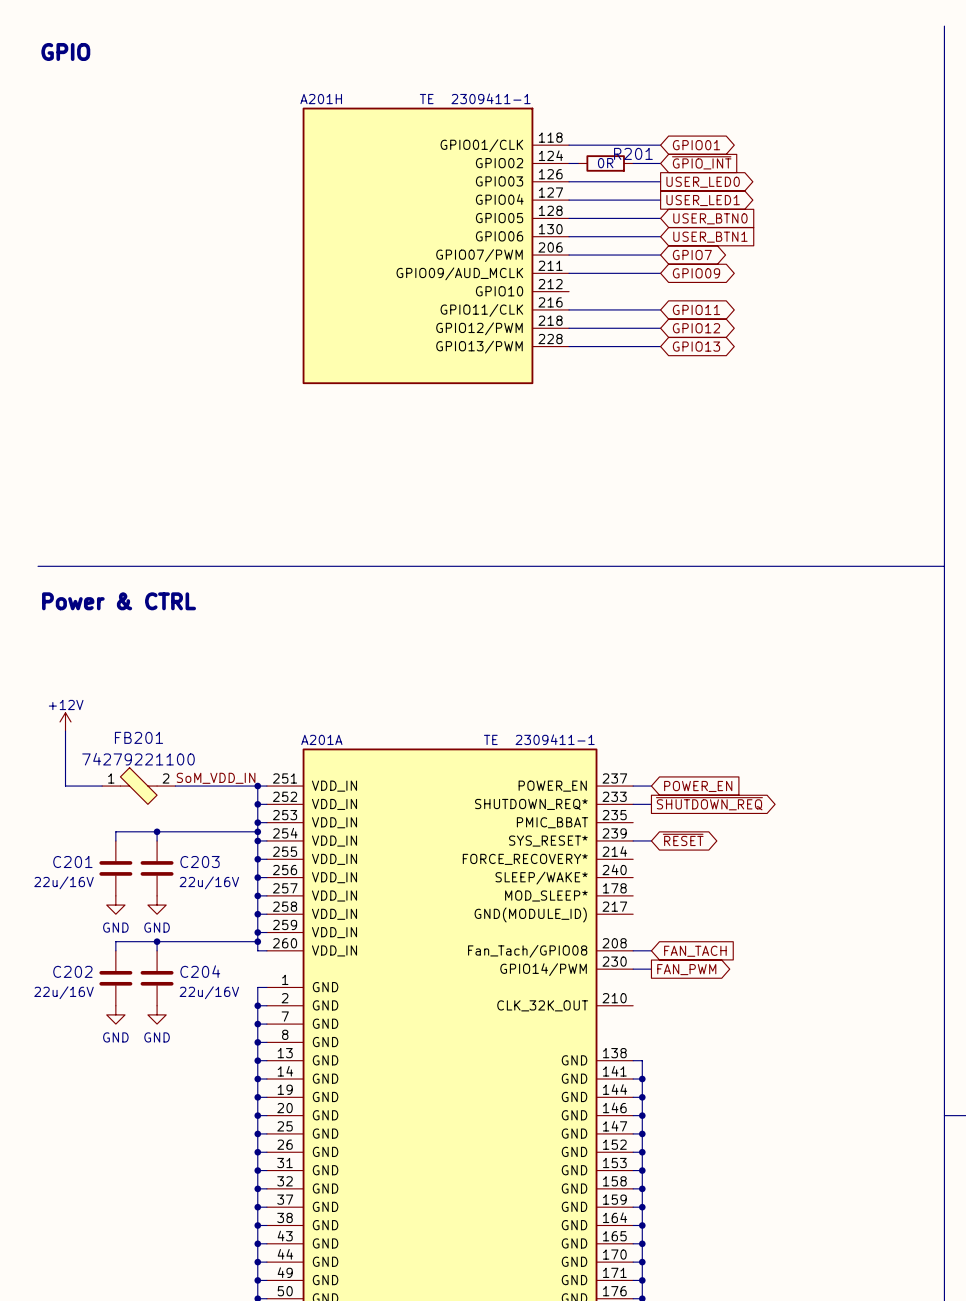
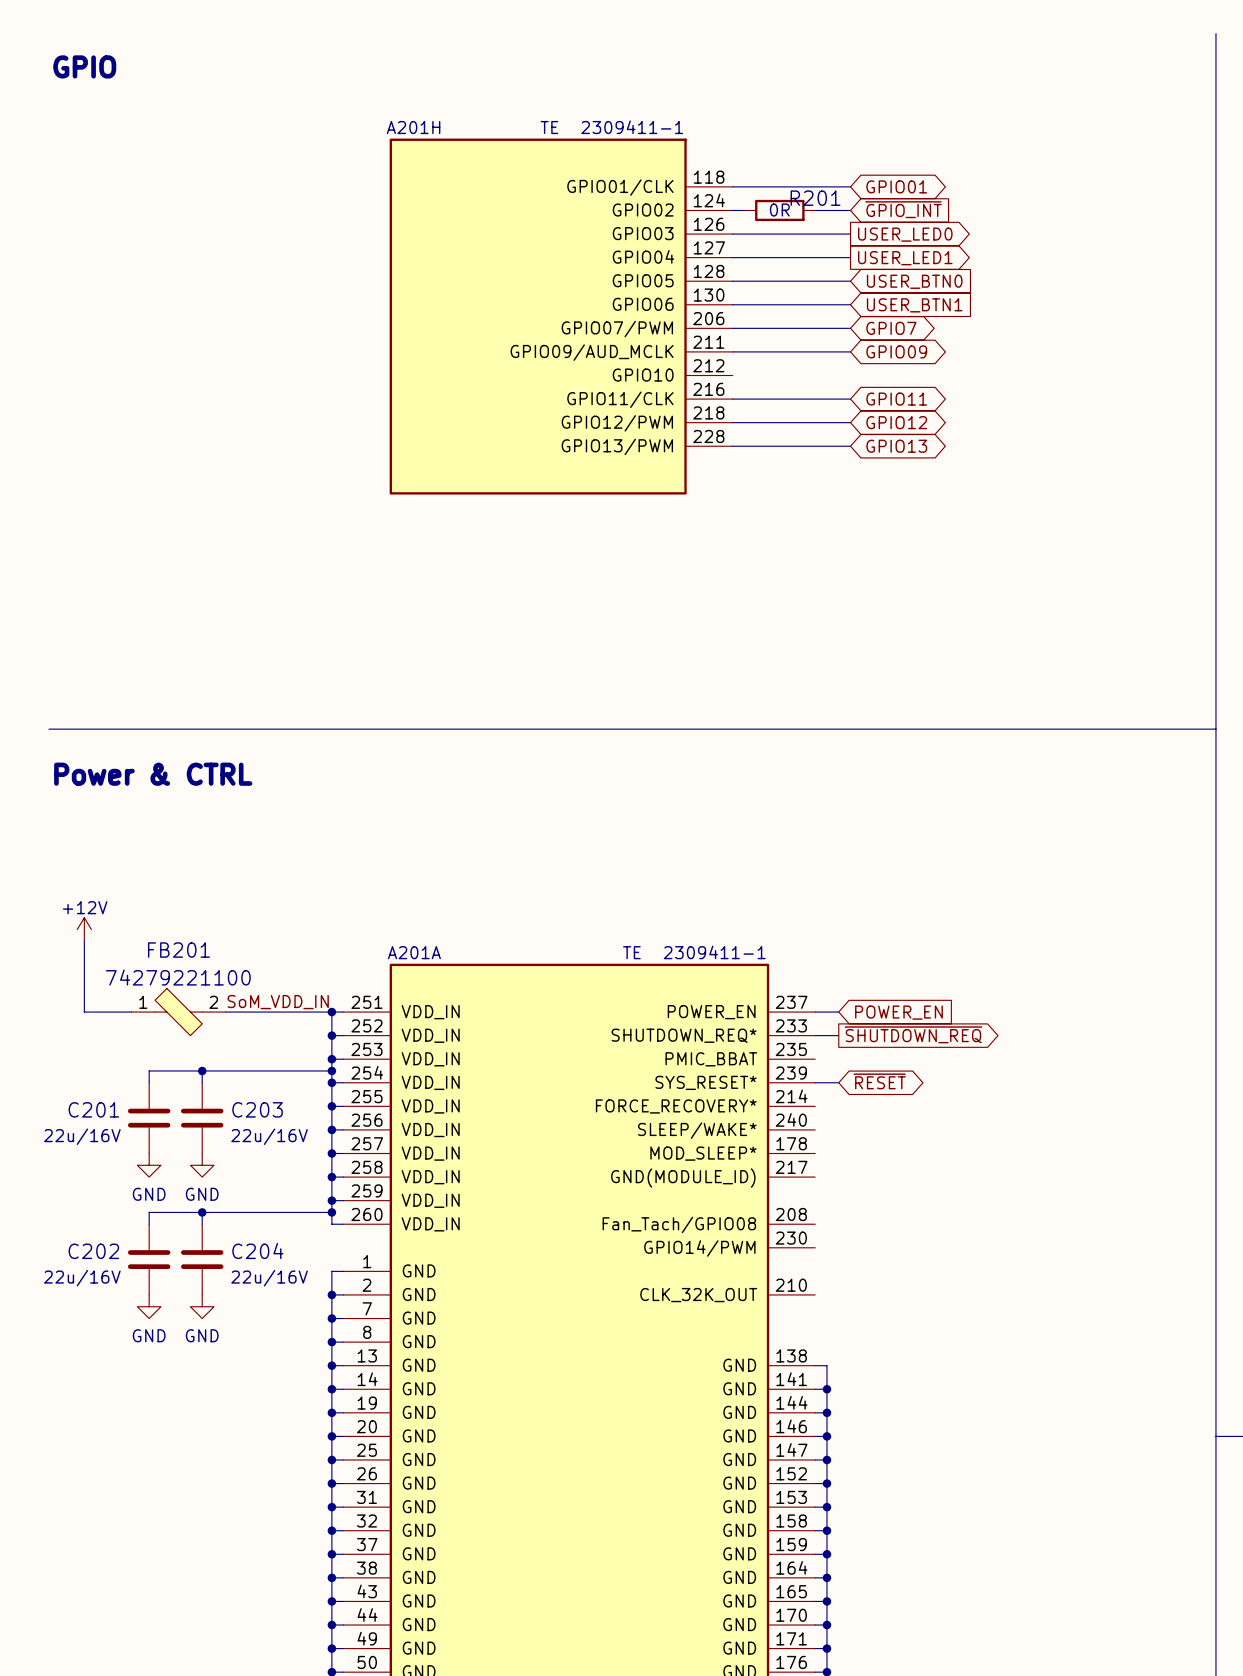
wire: (633, 950) (651, 950) -> none
global label: FAN_TACH (695, 951) -> none
wire: (633, 969) (651, 969) -> none
global label: FAN_PWM (686, 969) -> none

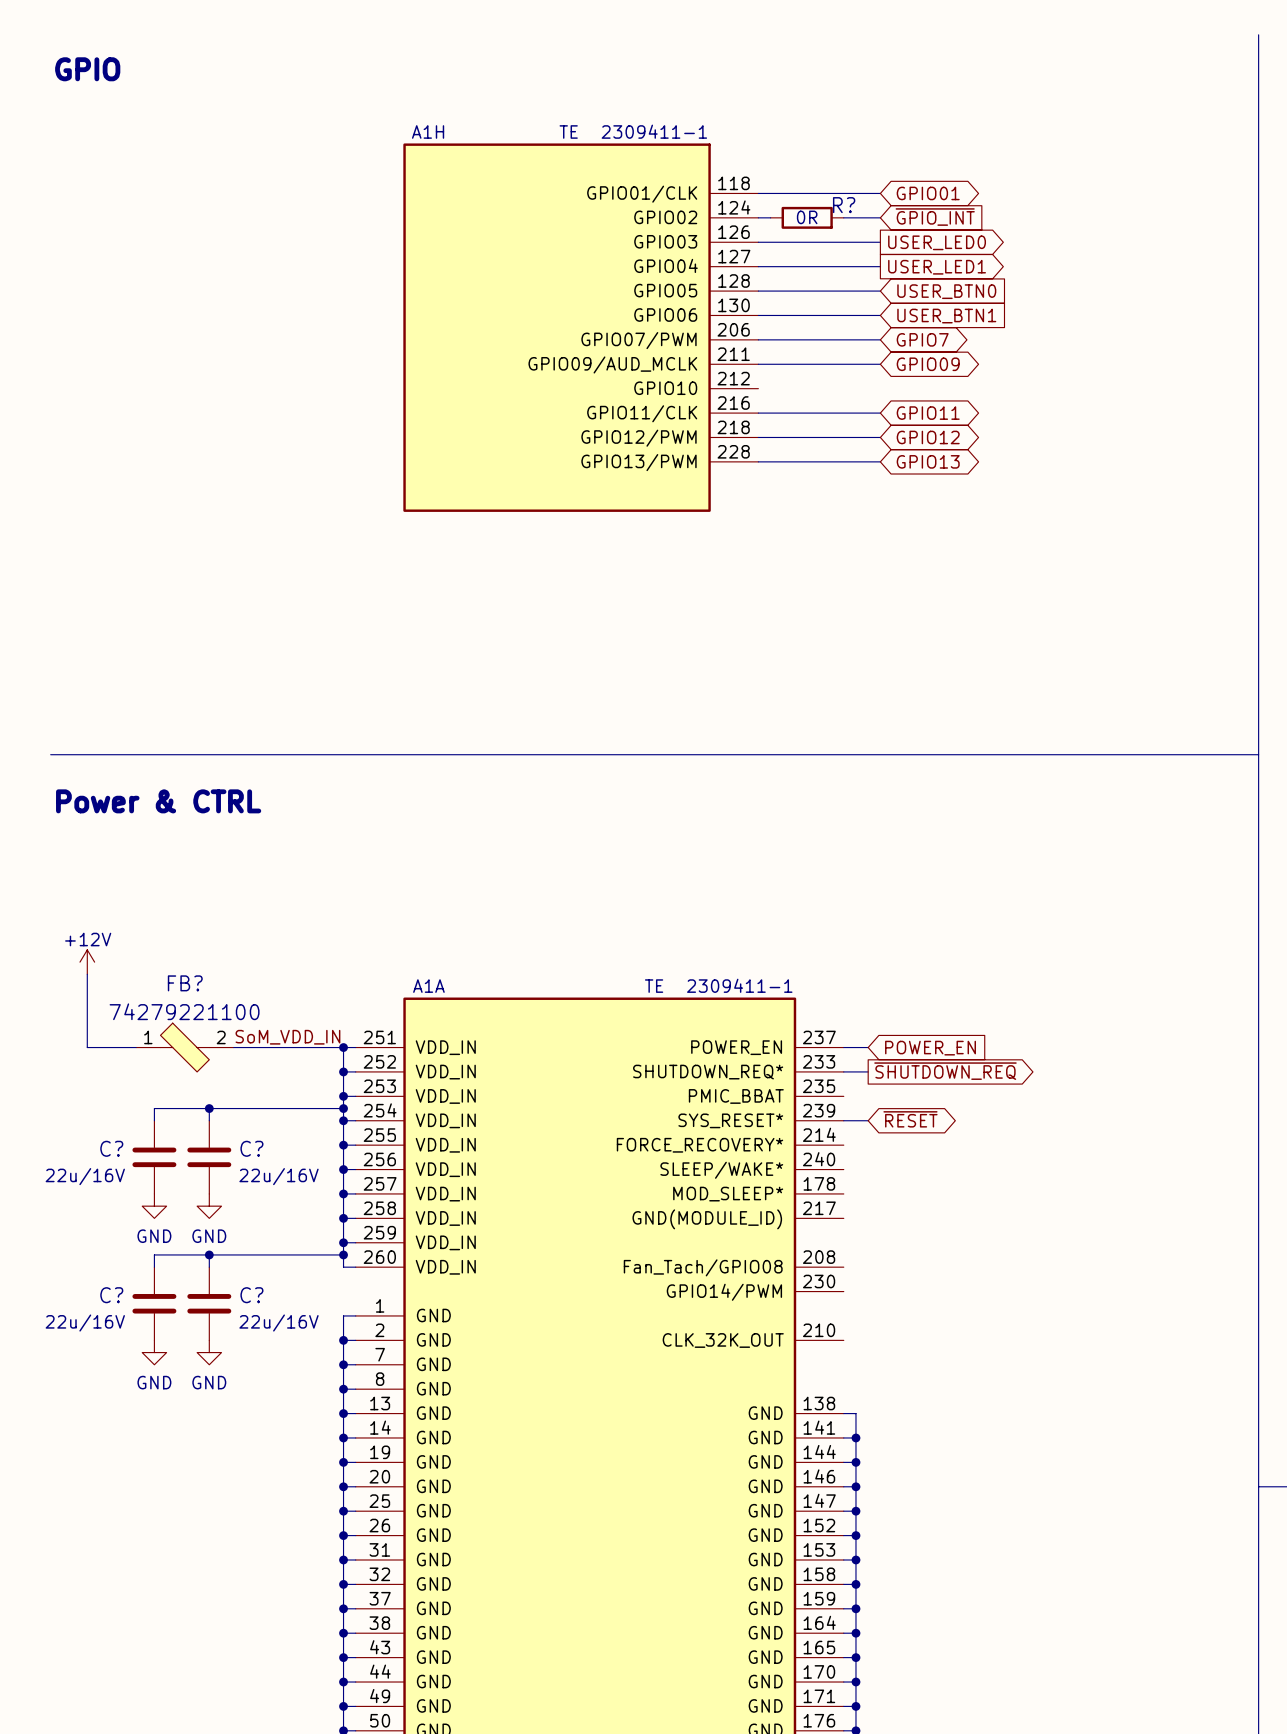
A201H name: A201H (413, 127) -> A1H (428, 131)
R201 name: R201 (815, 198) -> R? (844, 205)
FB201 name: FB201 (178, 950) -> FB? (185, 983)
A201A name: A201A (414, 952) -> A1A (428, 986)
C201 name: C201 (93, 1109) -> C? (111, 1148)
C203 name: C203 (257, 1109) -> C? (251, 1148)
C204 name: C204 (257, 1250) -> C? (251, 1295)
C202 name: C202 (93, 1251) -> C? (111, 1295)

